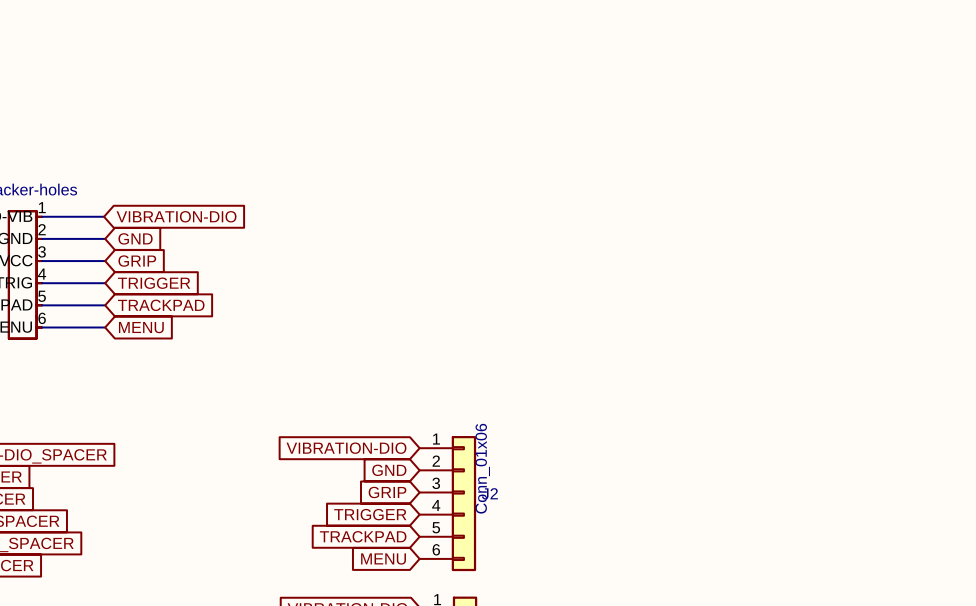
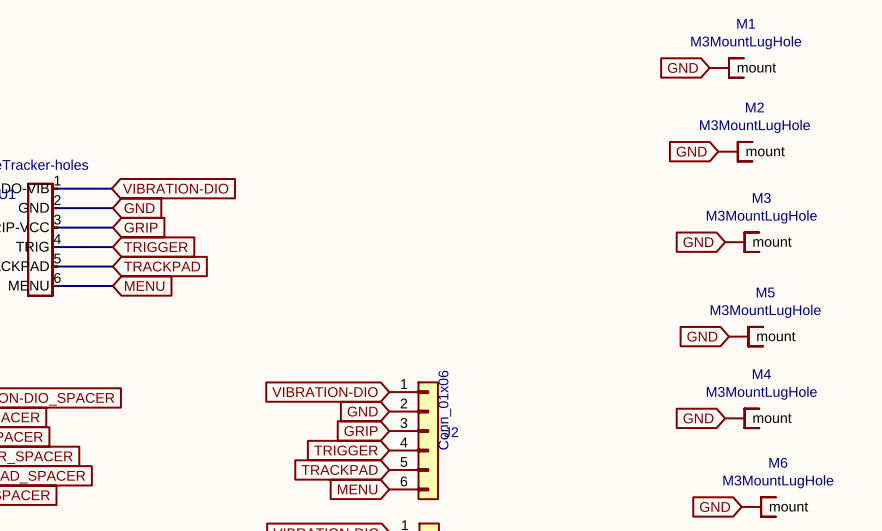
global label: none -> GND (682, 67)
M1: none -> M3MountLugHole (726, 67)
global label: none -> GND (691, 151)
M2: none -> M3MountLugHole (735, 151)
global label: none -> GND (698, 242)
M3: none -> M3MountLugHole (742, 242)
global label: none -> GND (702, 336)
M5: none -> M3MountLugHole (746, 336)
global label: none -> GND (698, 418)
M4: none -> M3MountLugHole (742, 418)
global label: none -> GND (715, 506)
M6: none -> M3MountLugHole (758, 506)

